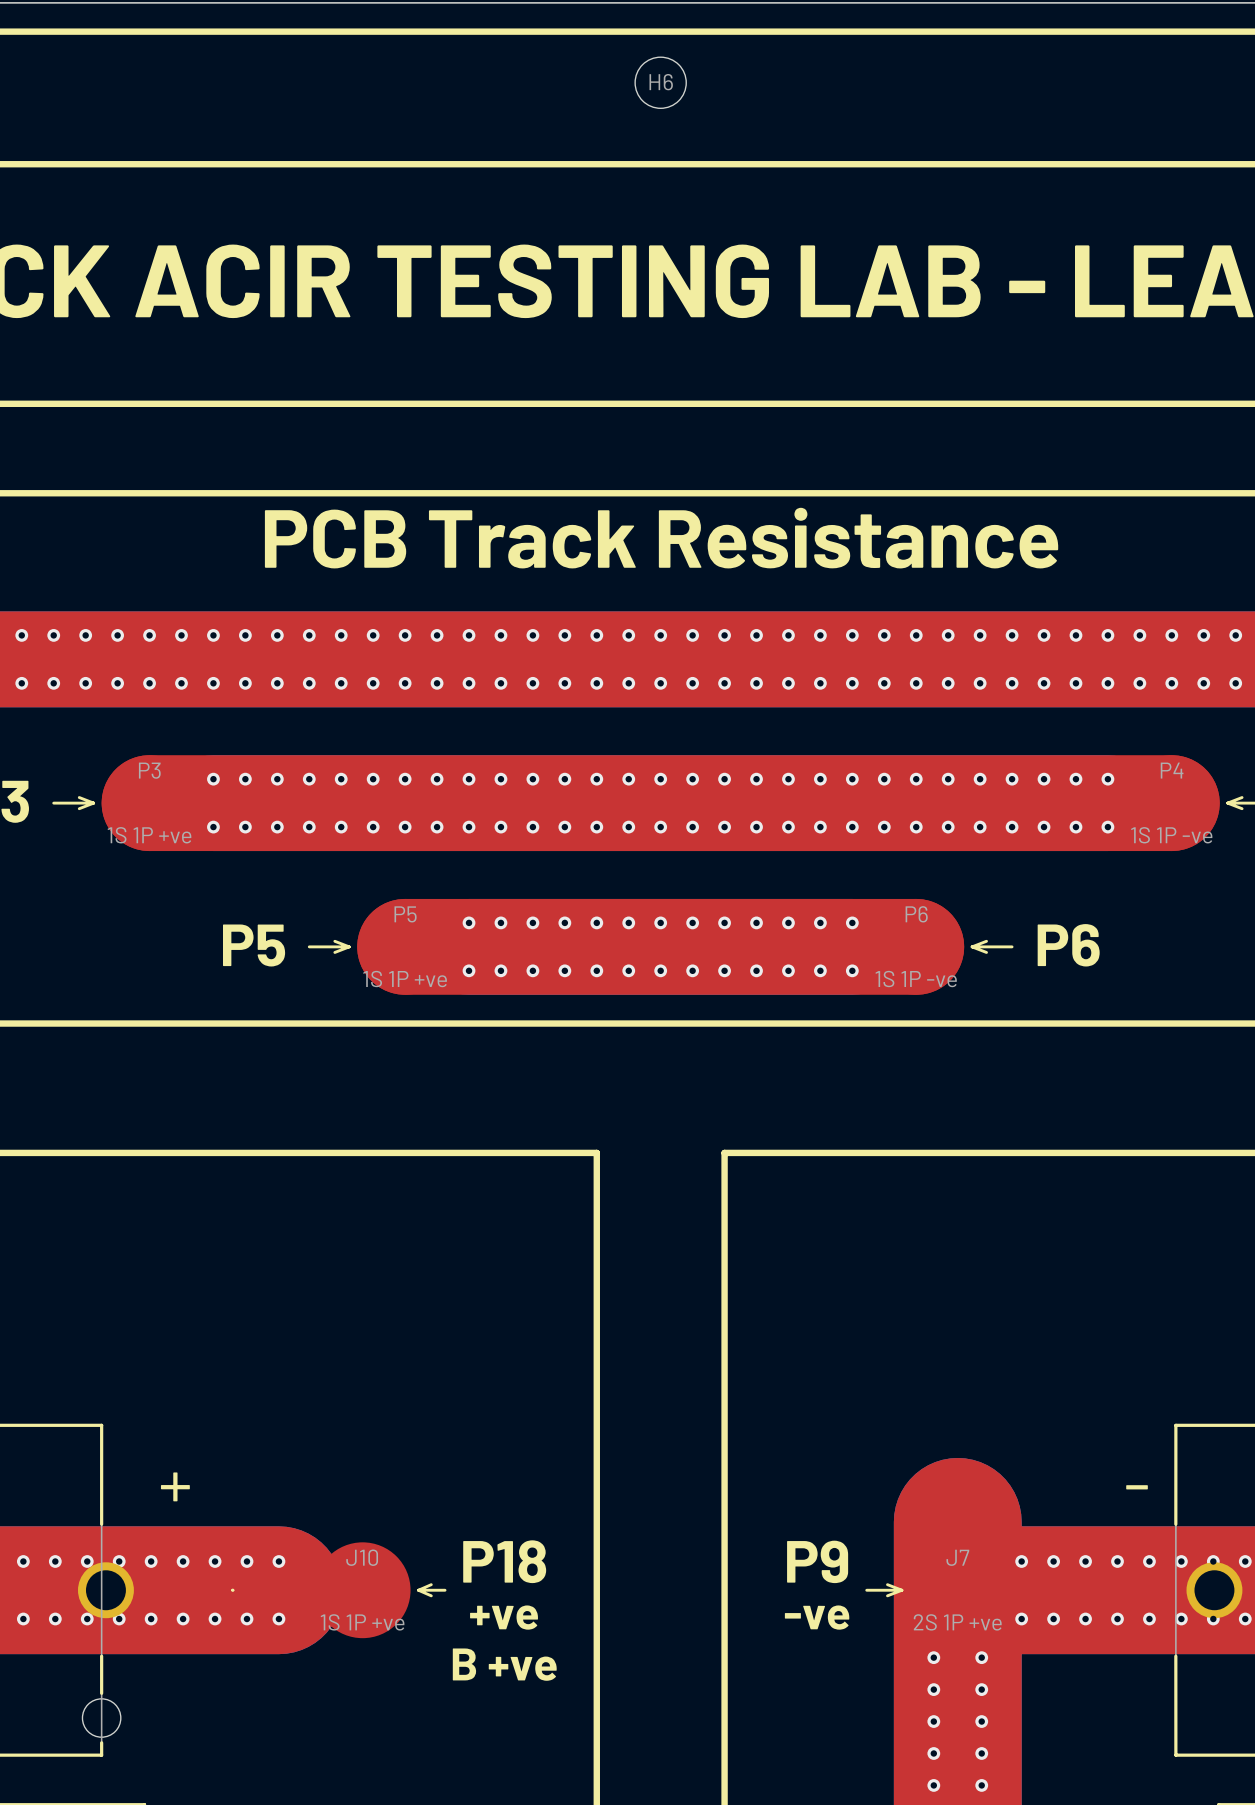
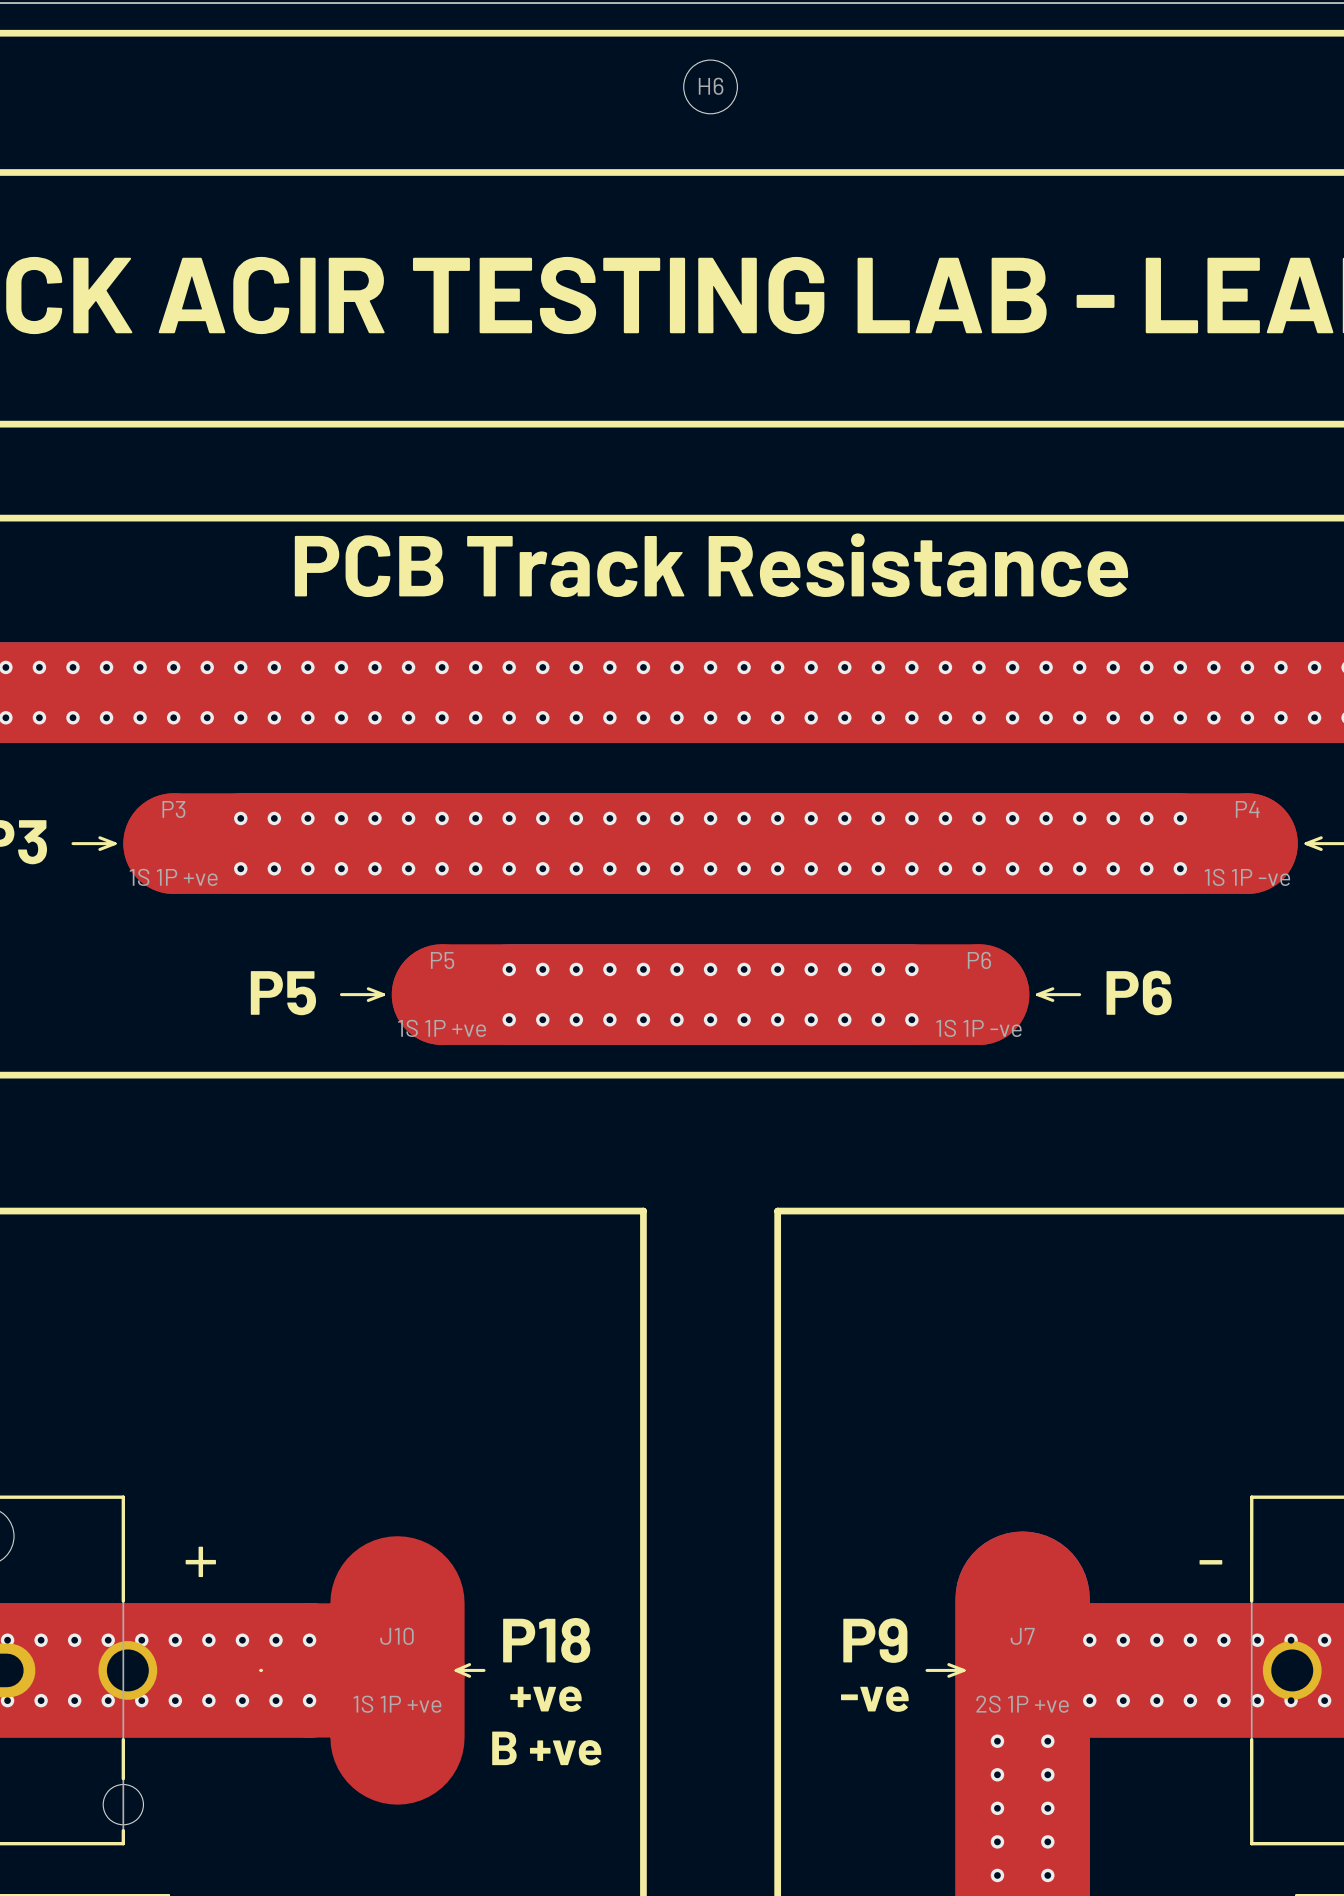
top track: none -> (397, 1603) (397, 1737)

